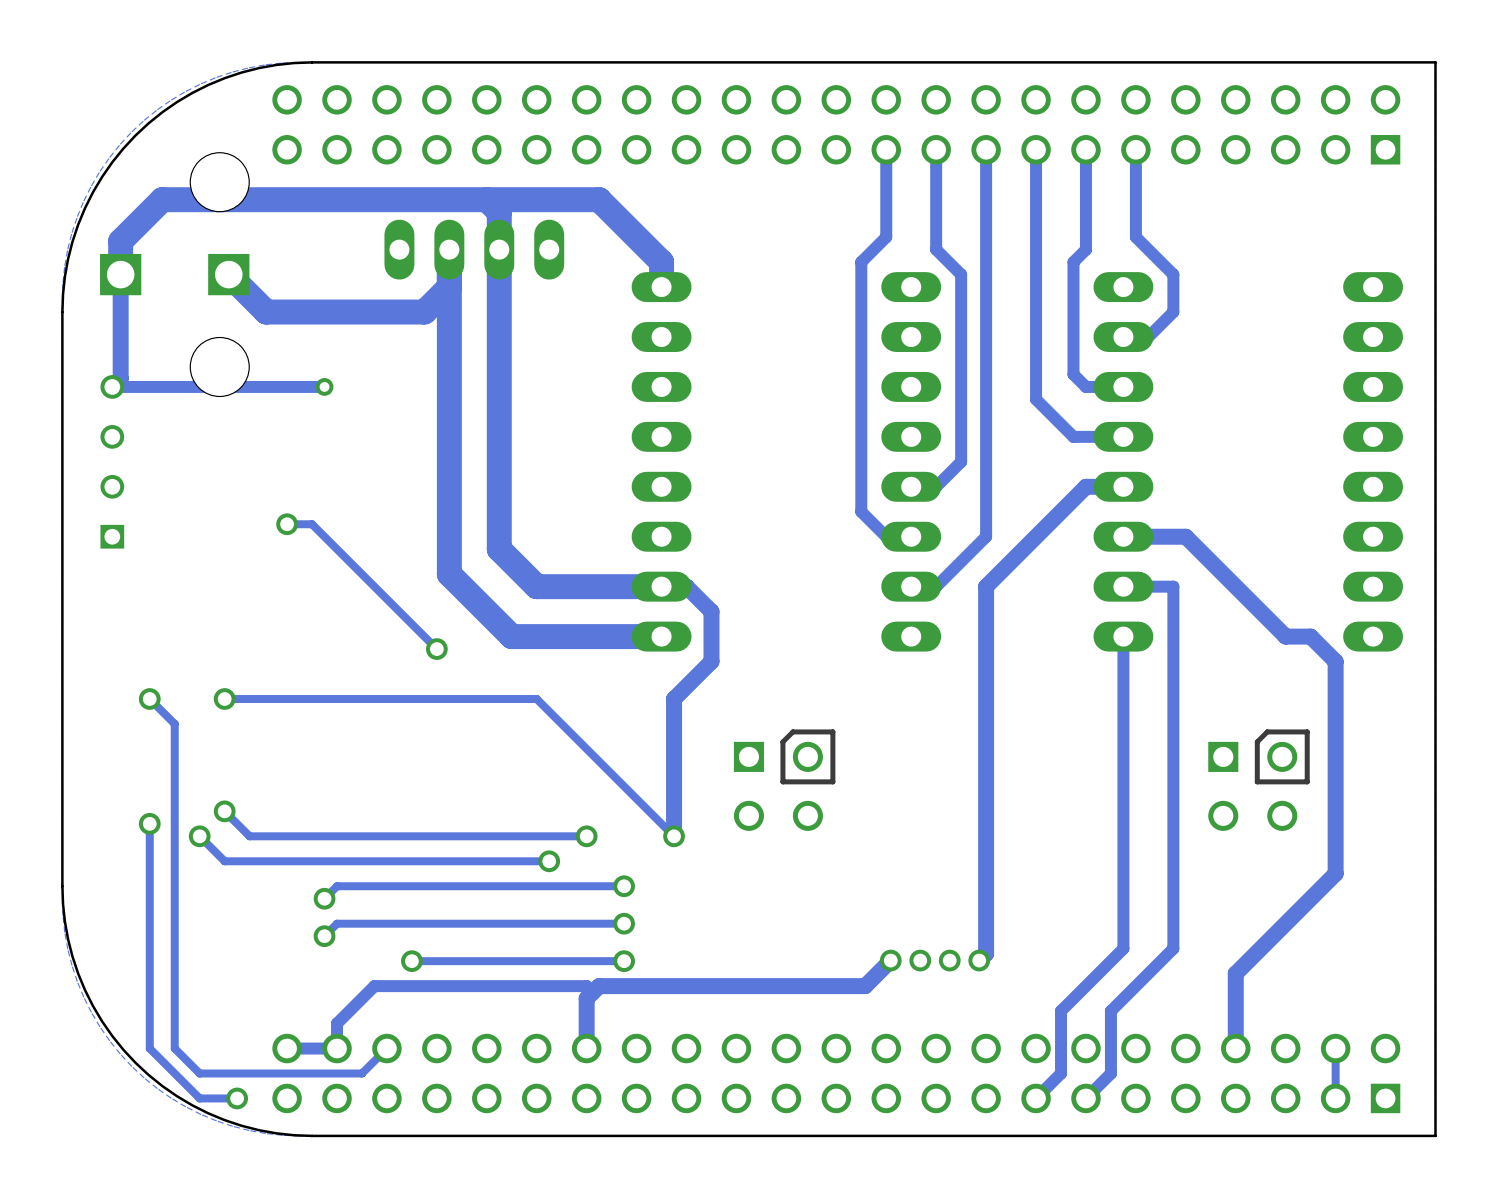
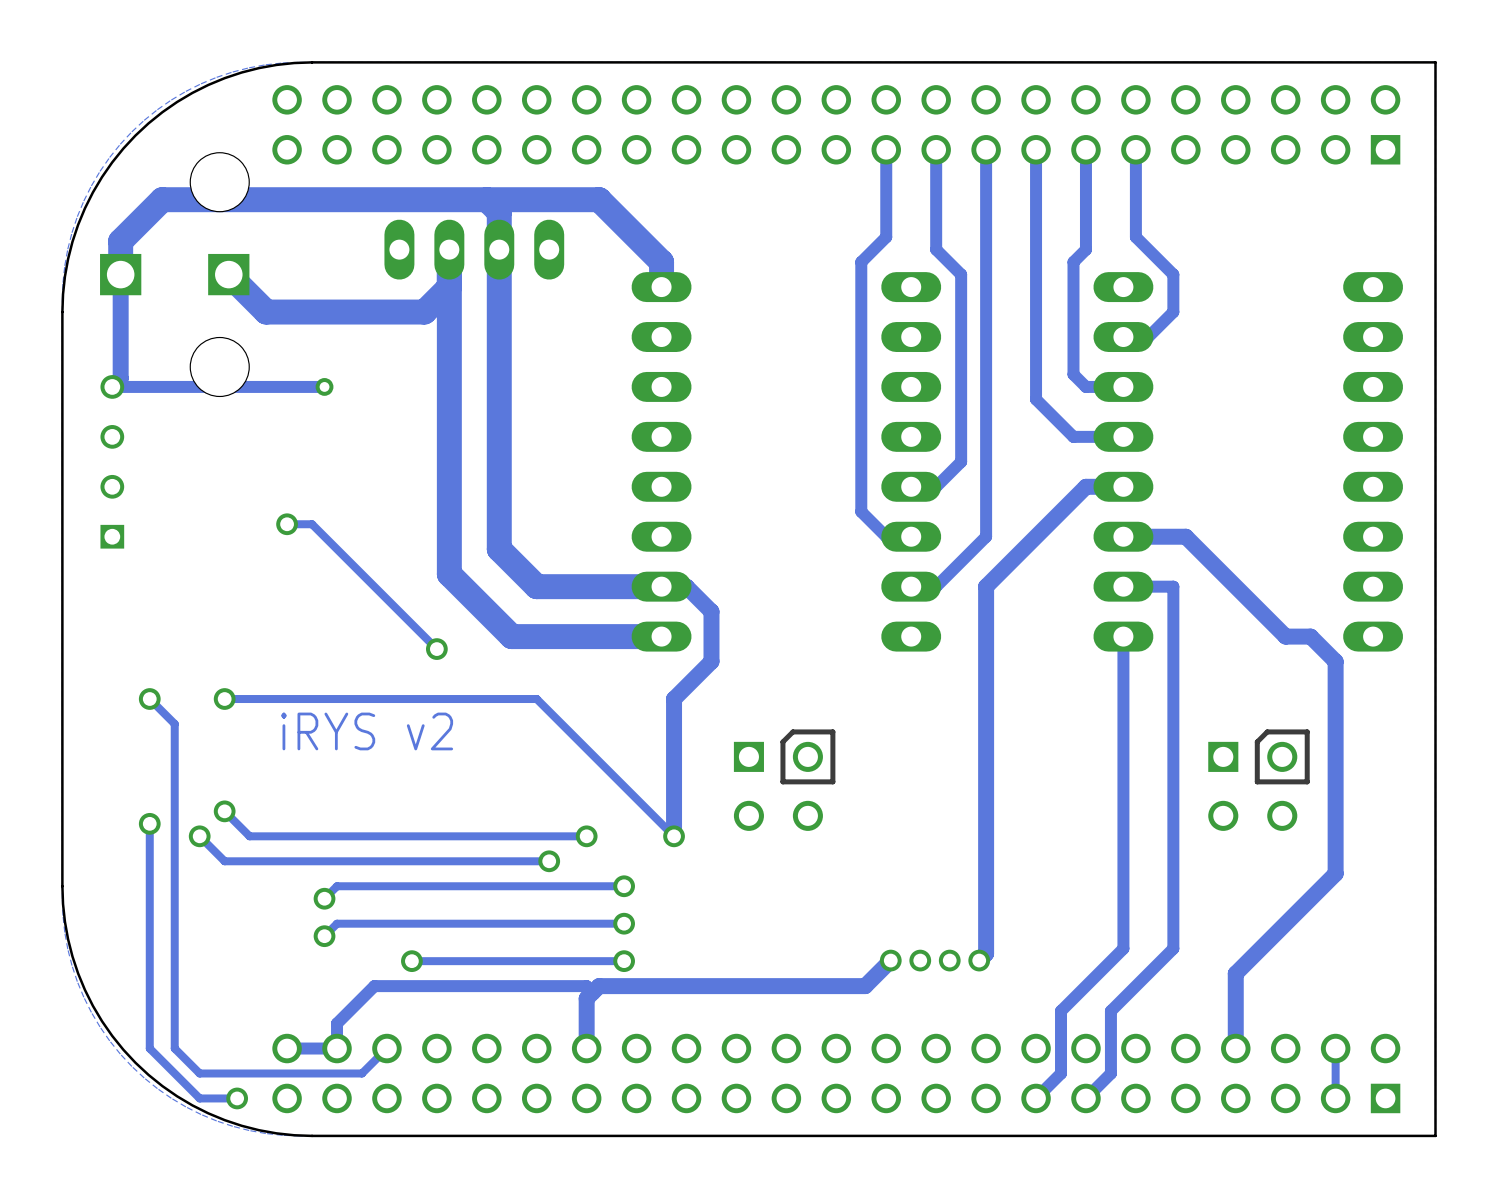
text: none -> iRYS v2 (367, 731)

